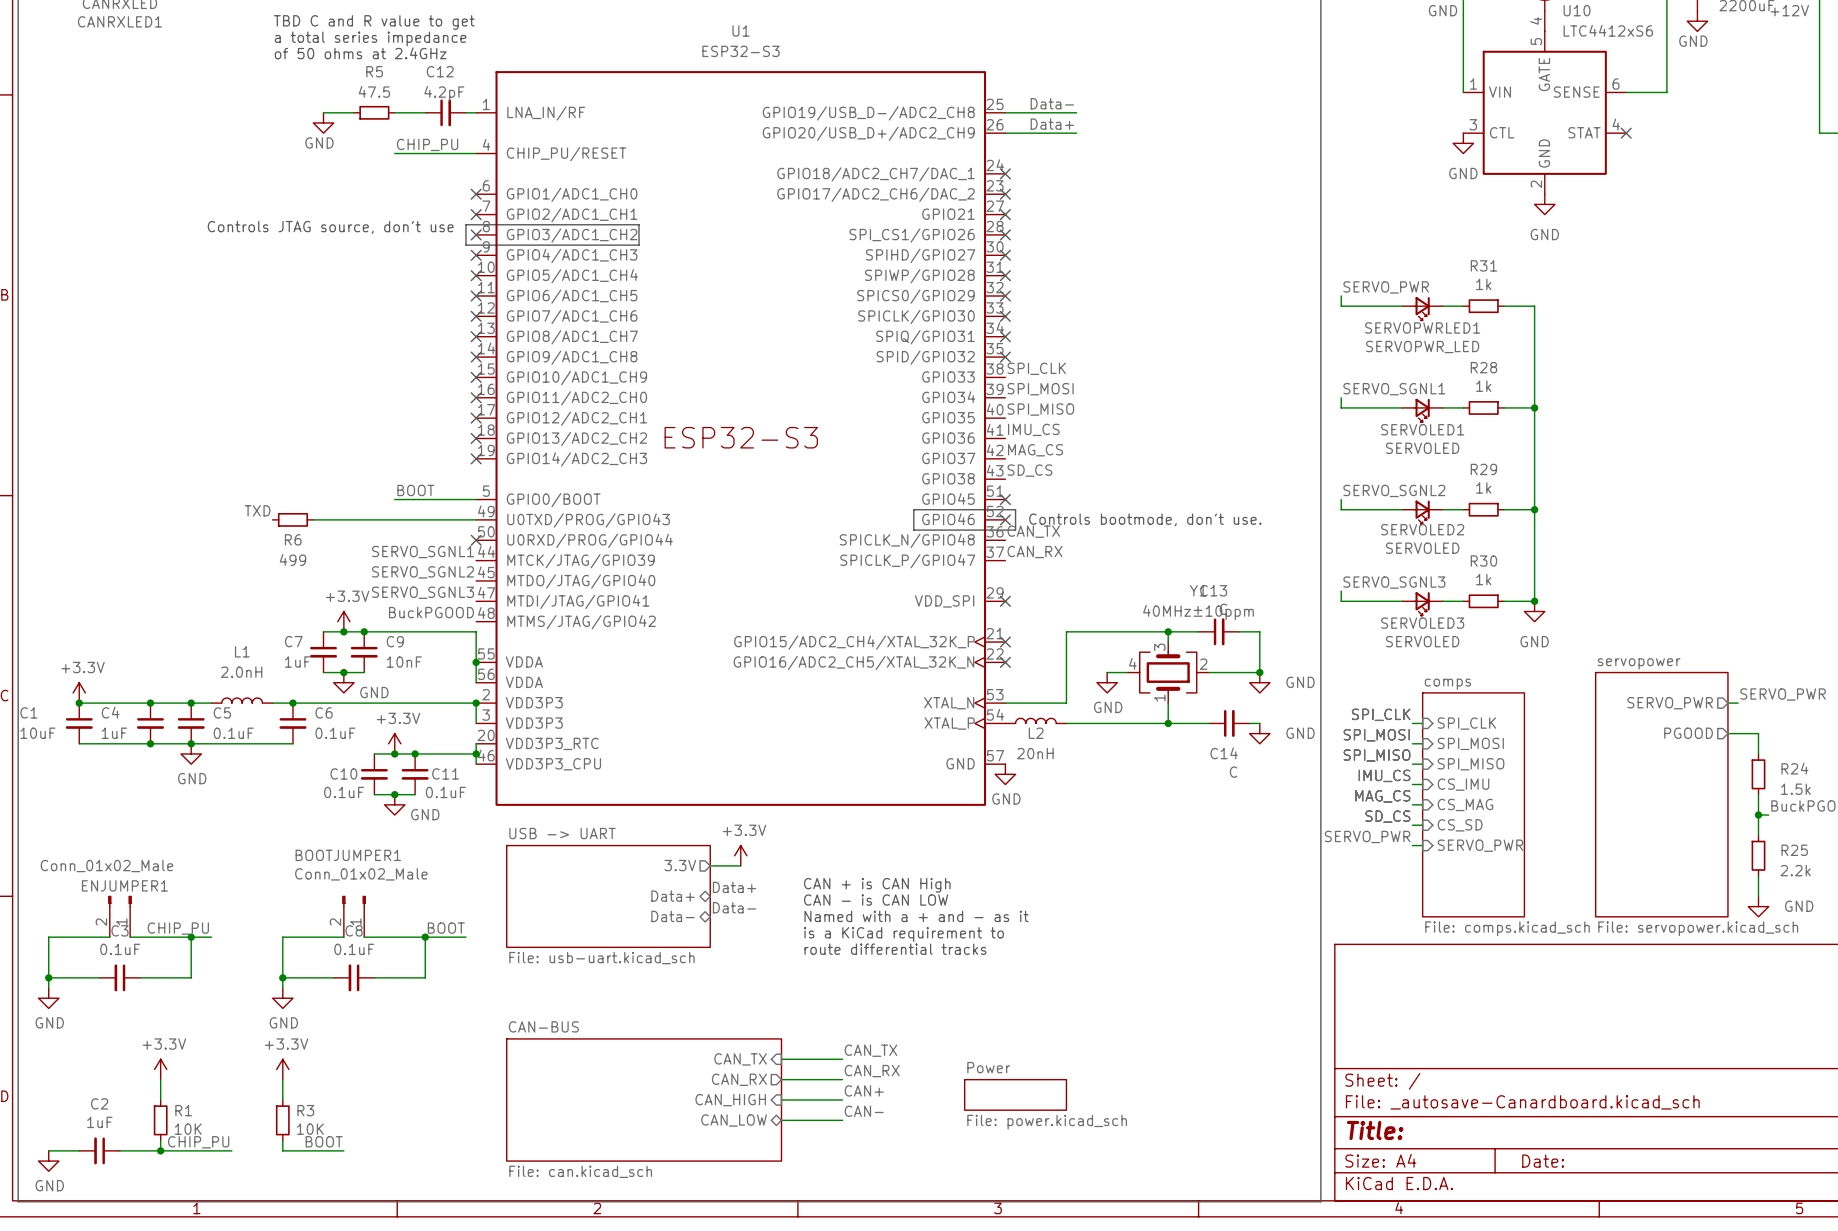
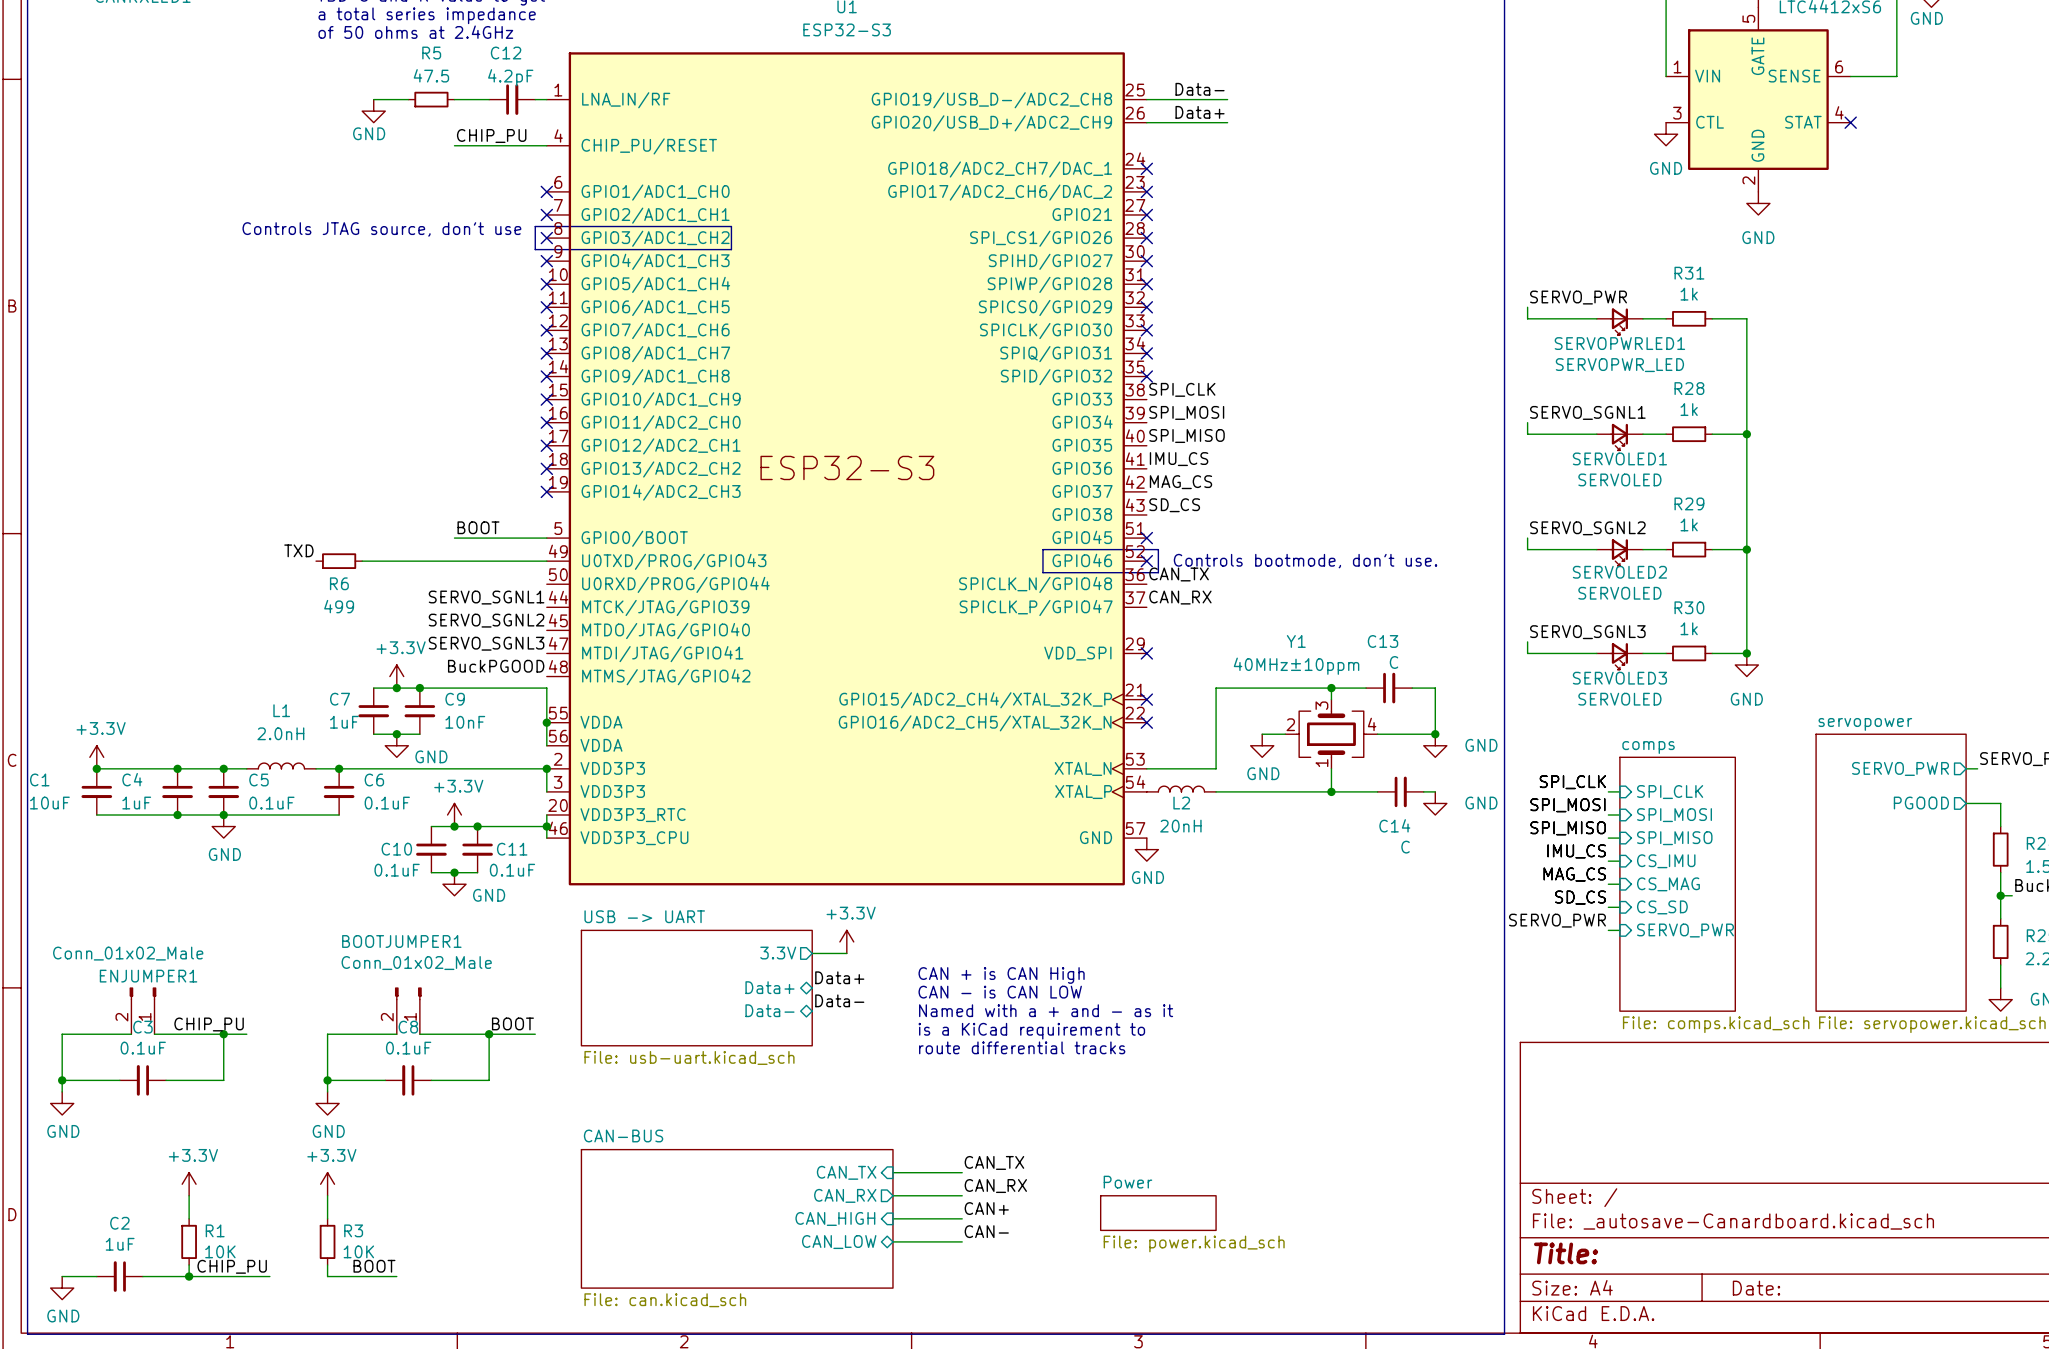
no-connect mark: (476, 540) -> none
Y1 flip: as is (1168, 672) -> left-right (1331, 734)

